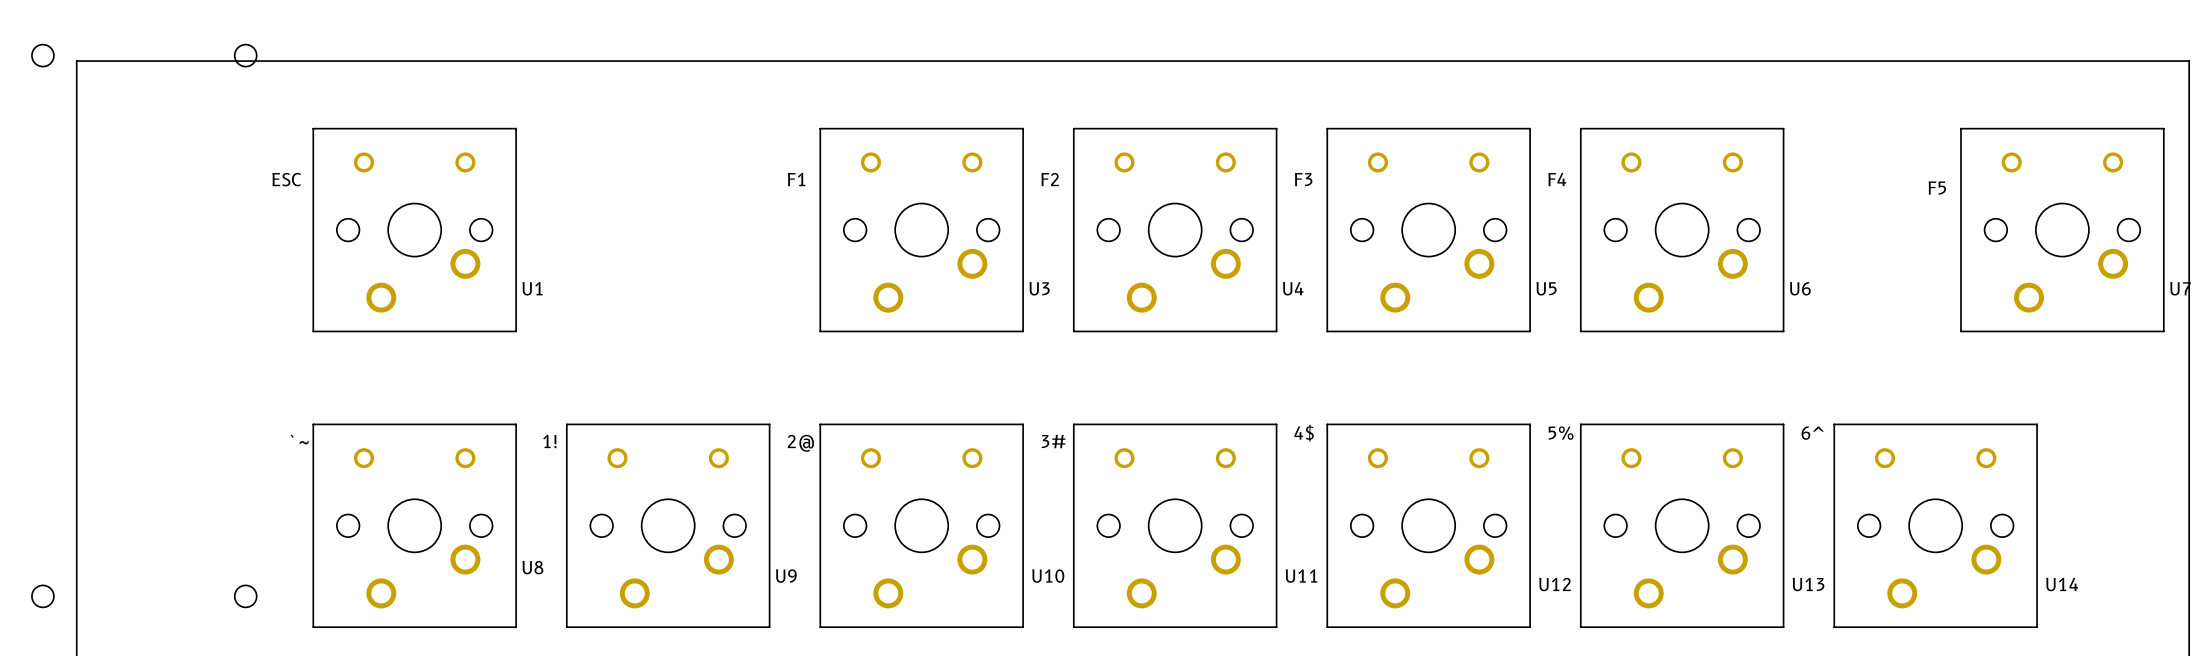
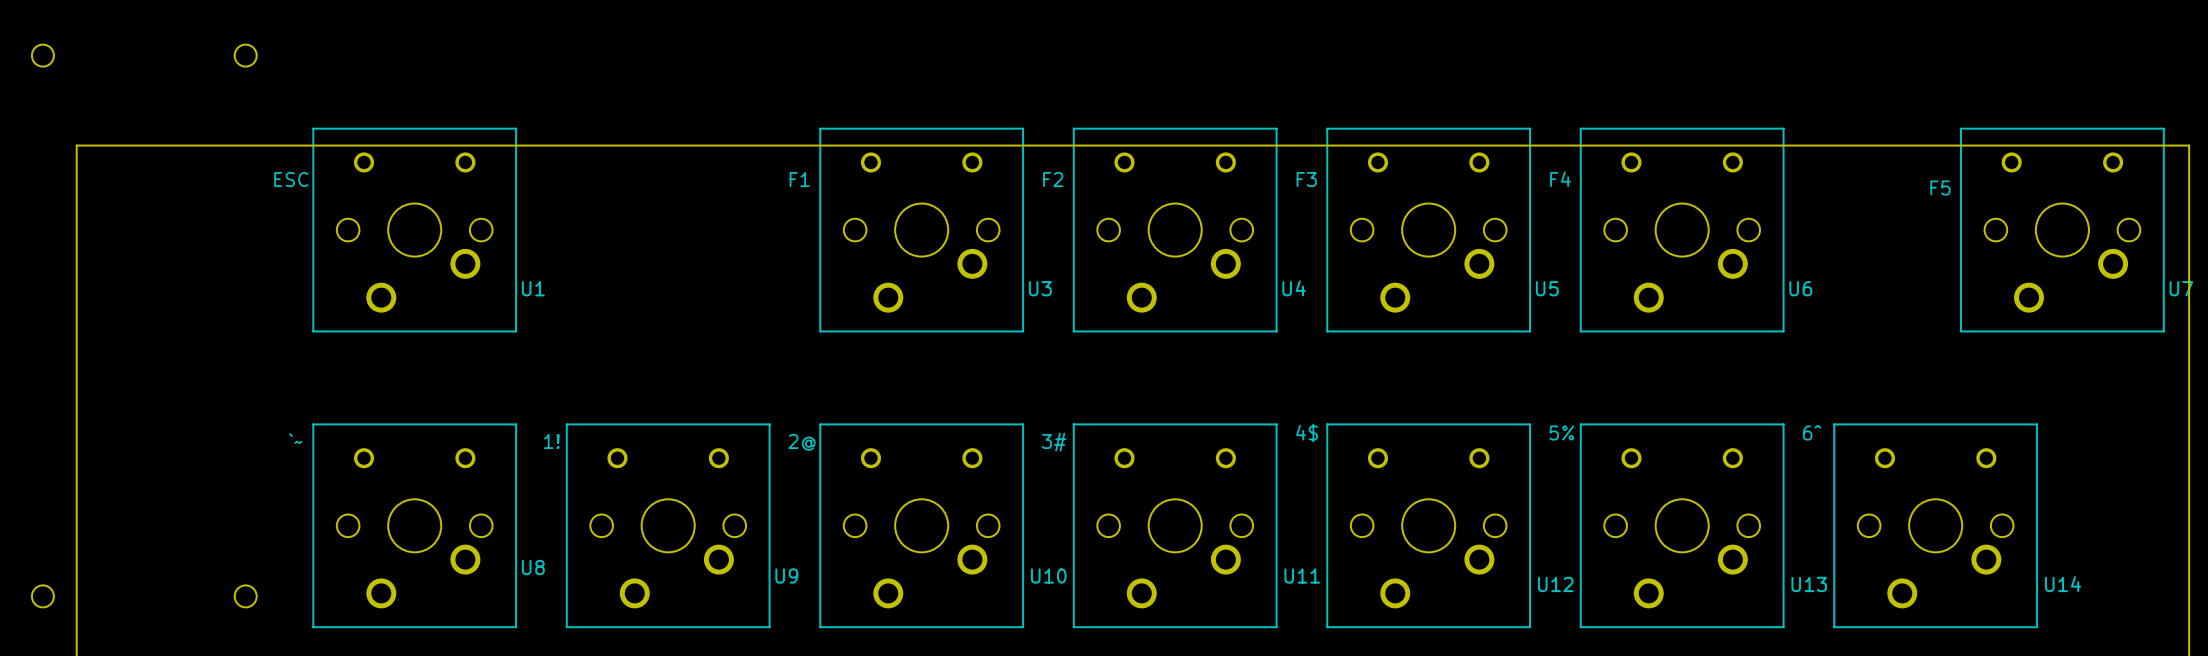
board edge: (76, 145) (76, 61) (2189, 61) (2189, 145) -> (76, 145) (2189, 145)

